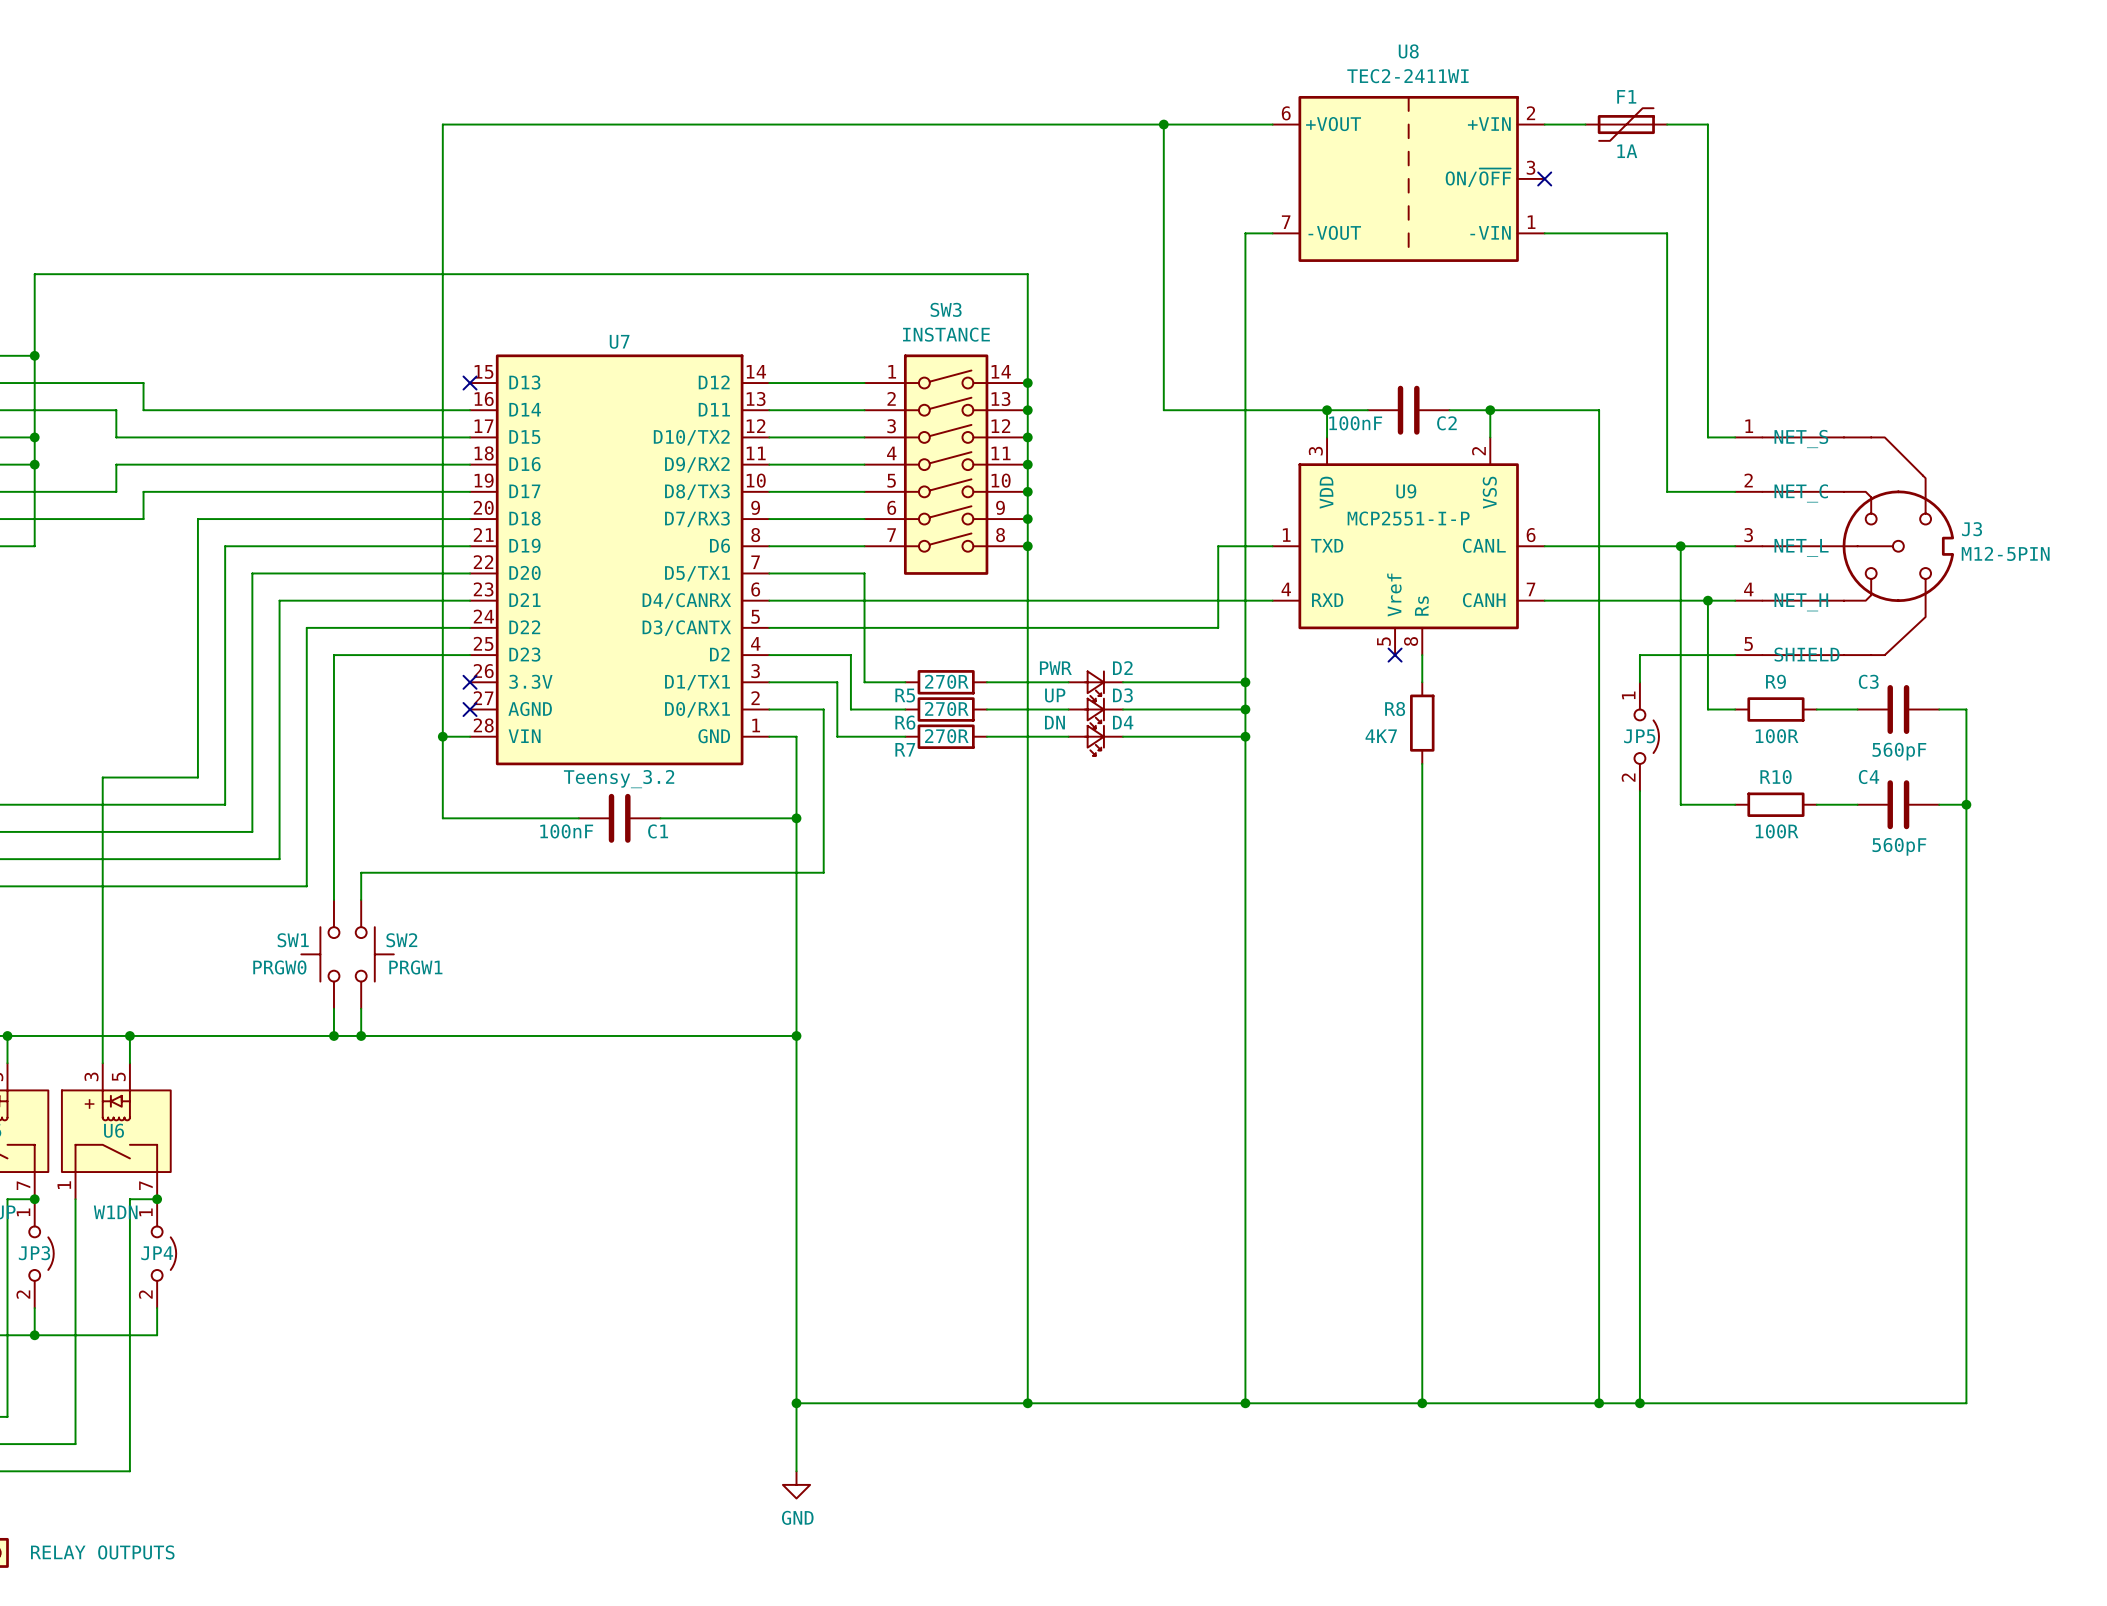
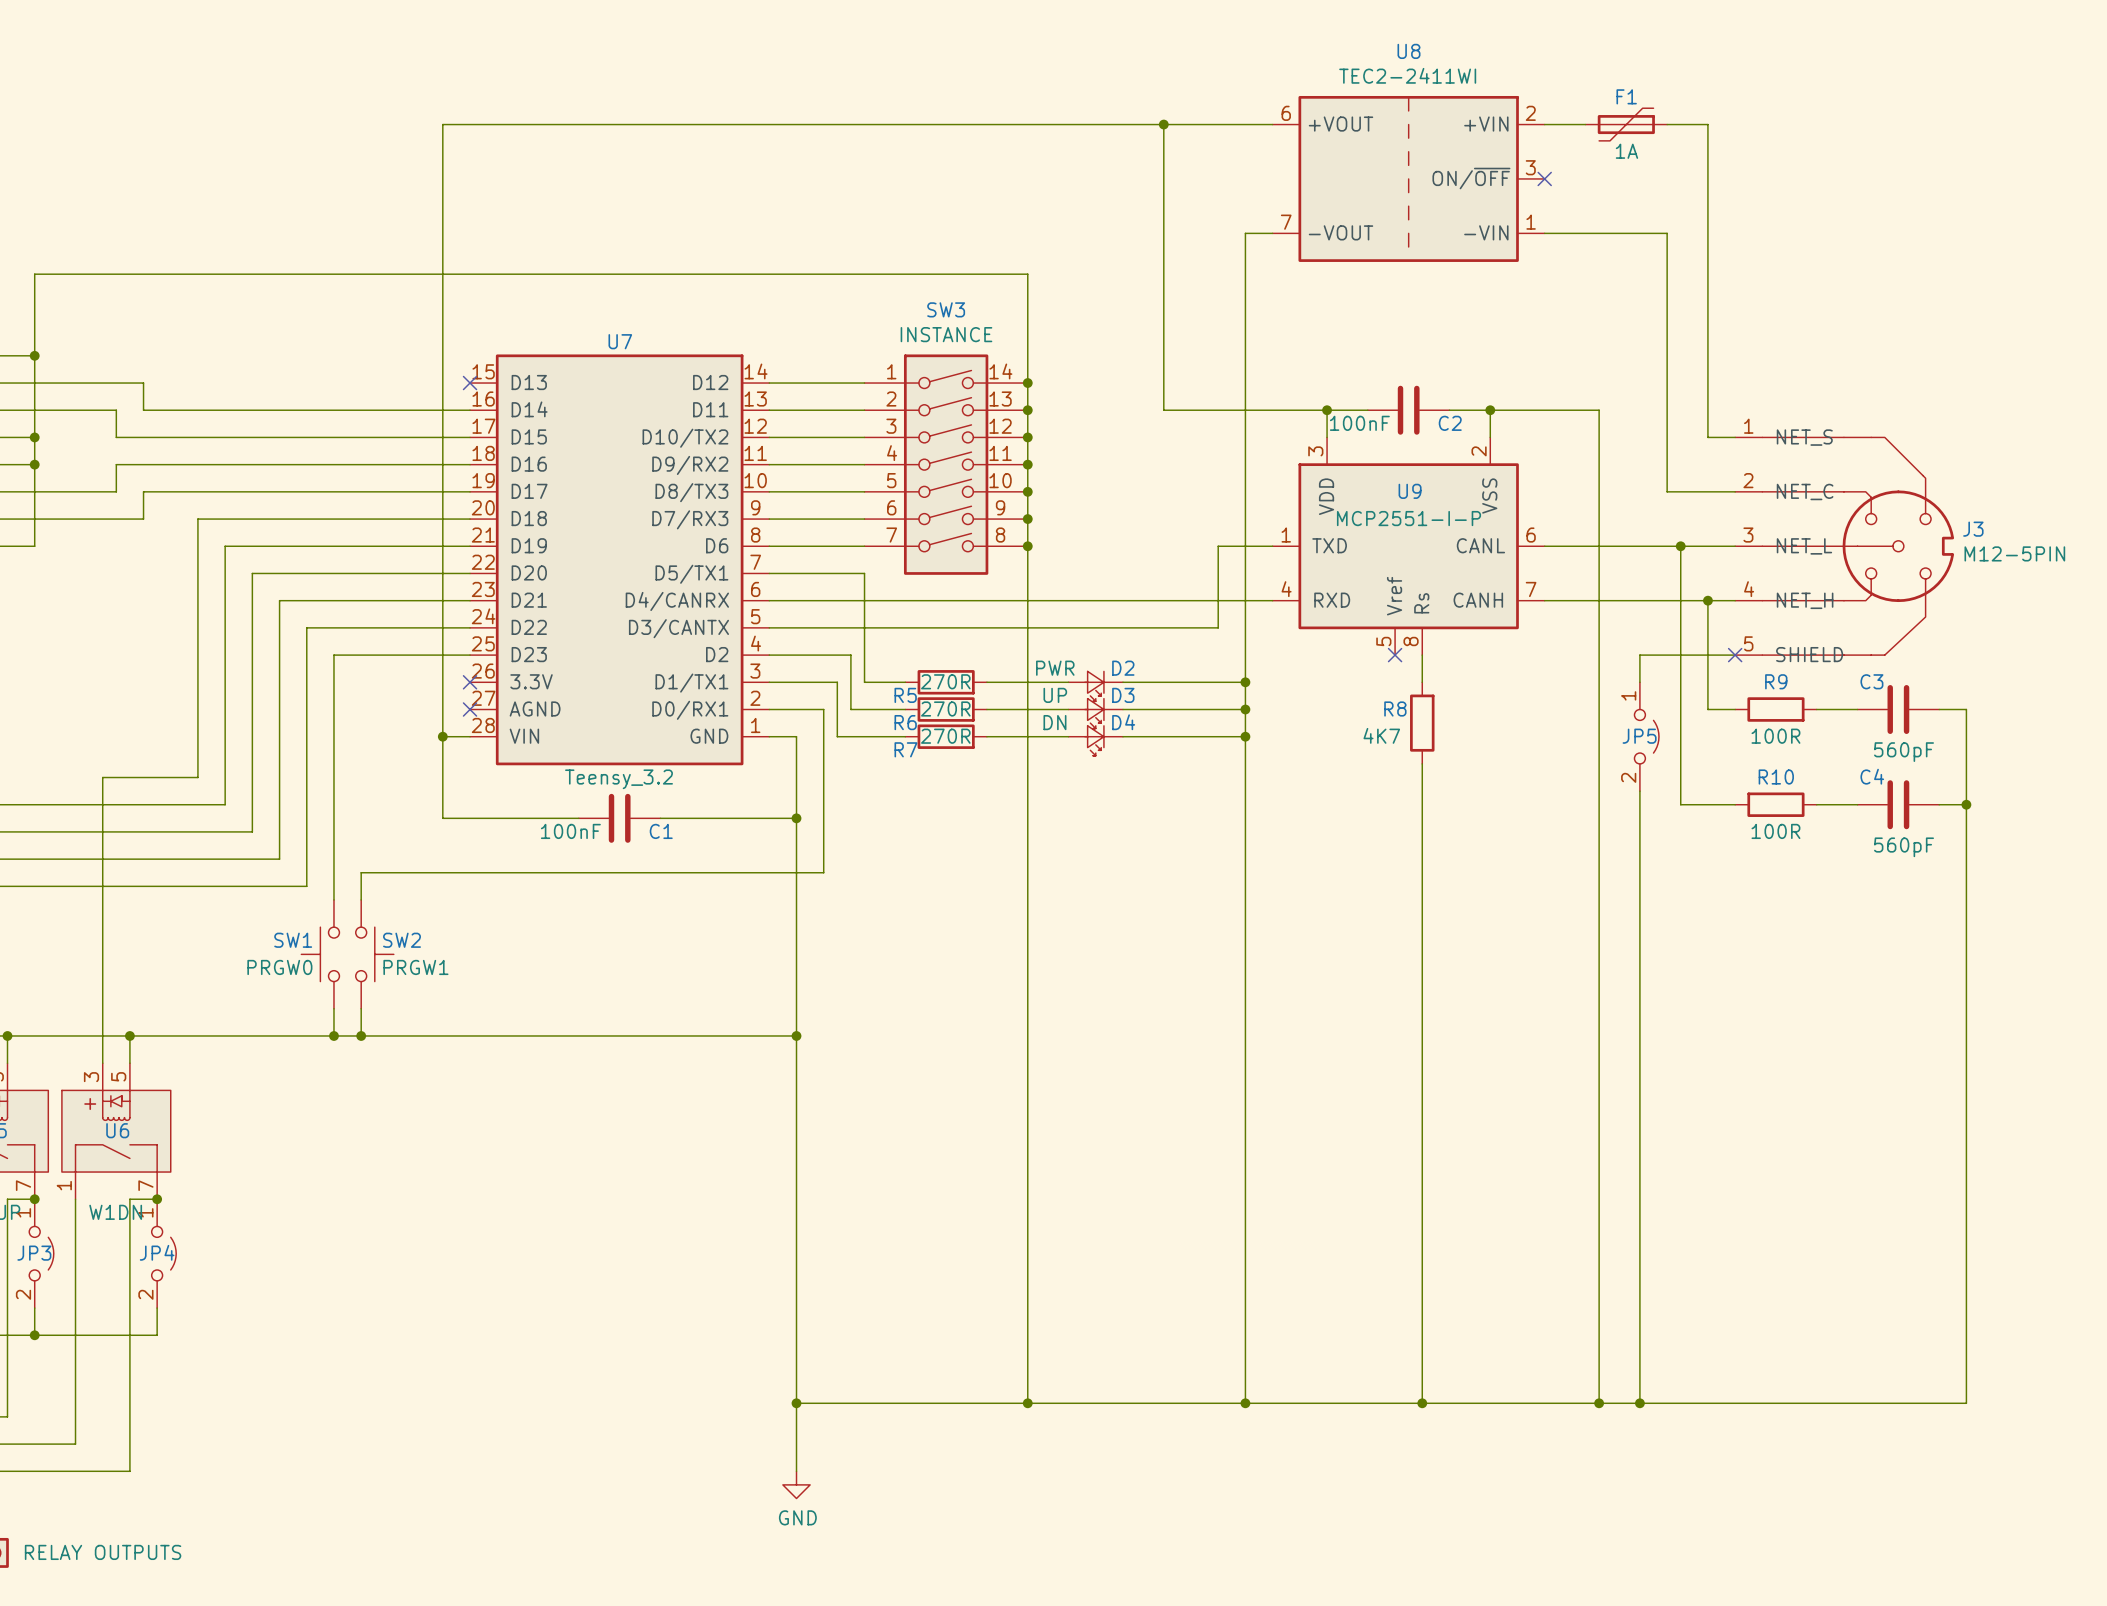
no-connect mark: none -> (1735, 655)

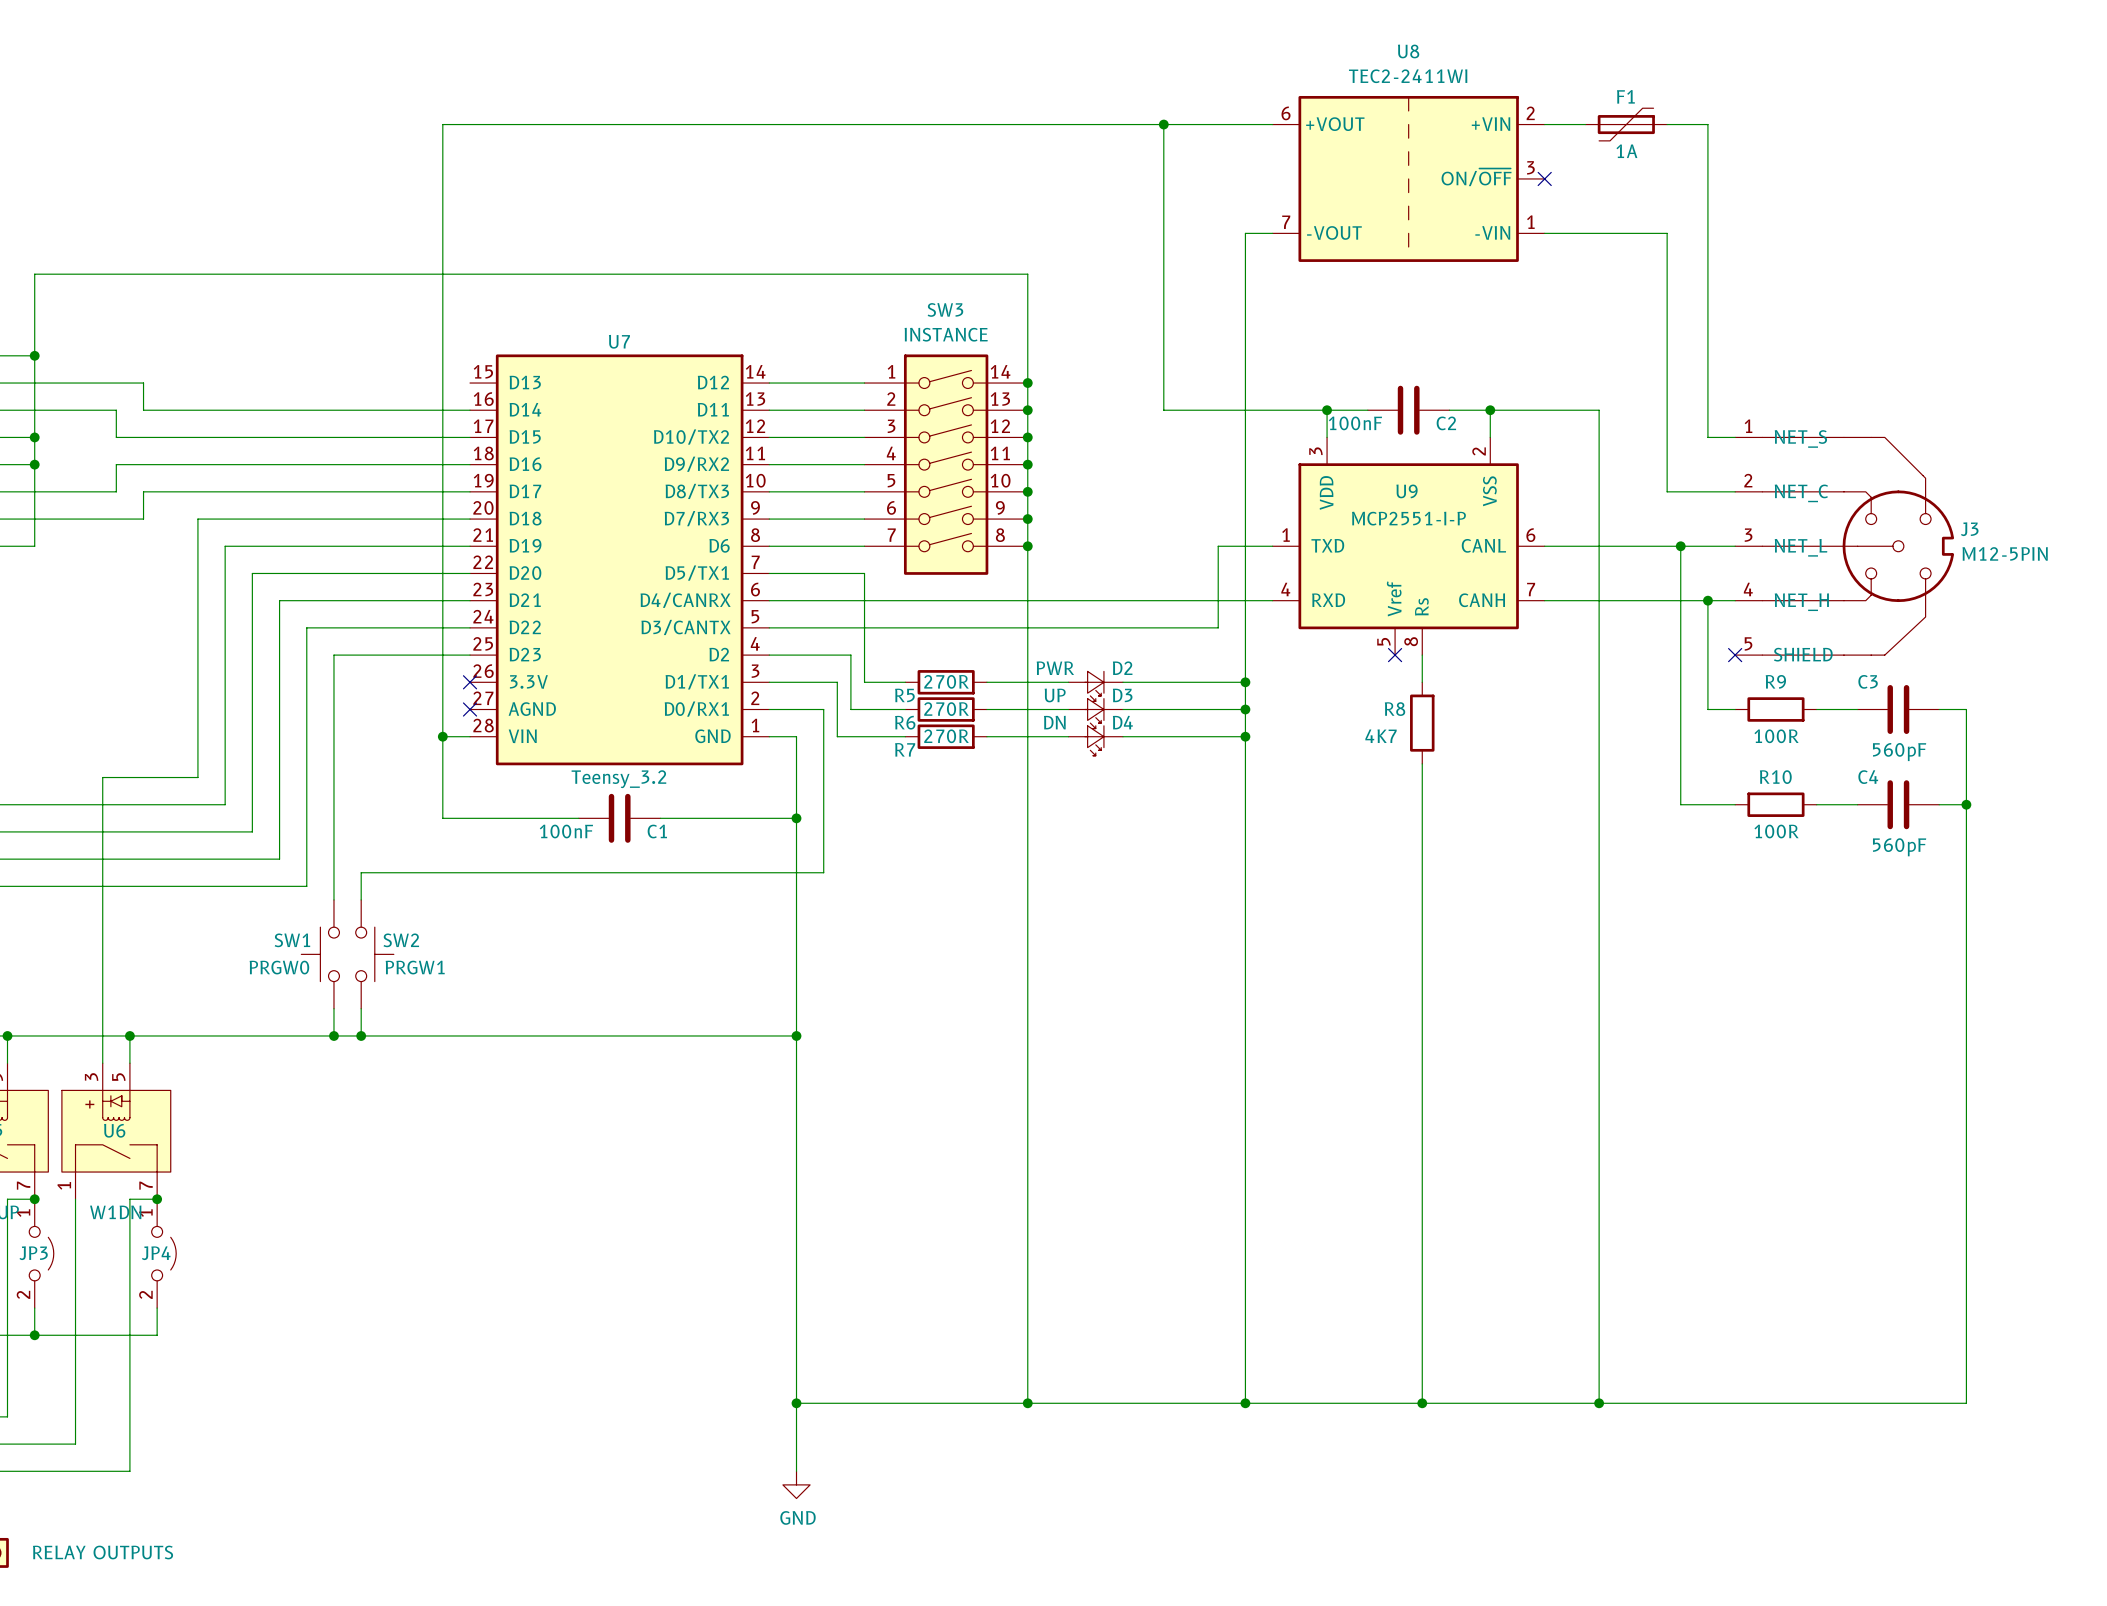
no-connect mark: (470, 383) -> none
wire: (1735, 655) (1639, 655) (1639, 682) -> none
JP5: (1646, 736) -> none
wire: (1639, 791) (1639, 1403) -> none
junction: (1639, 1403) -> none

